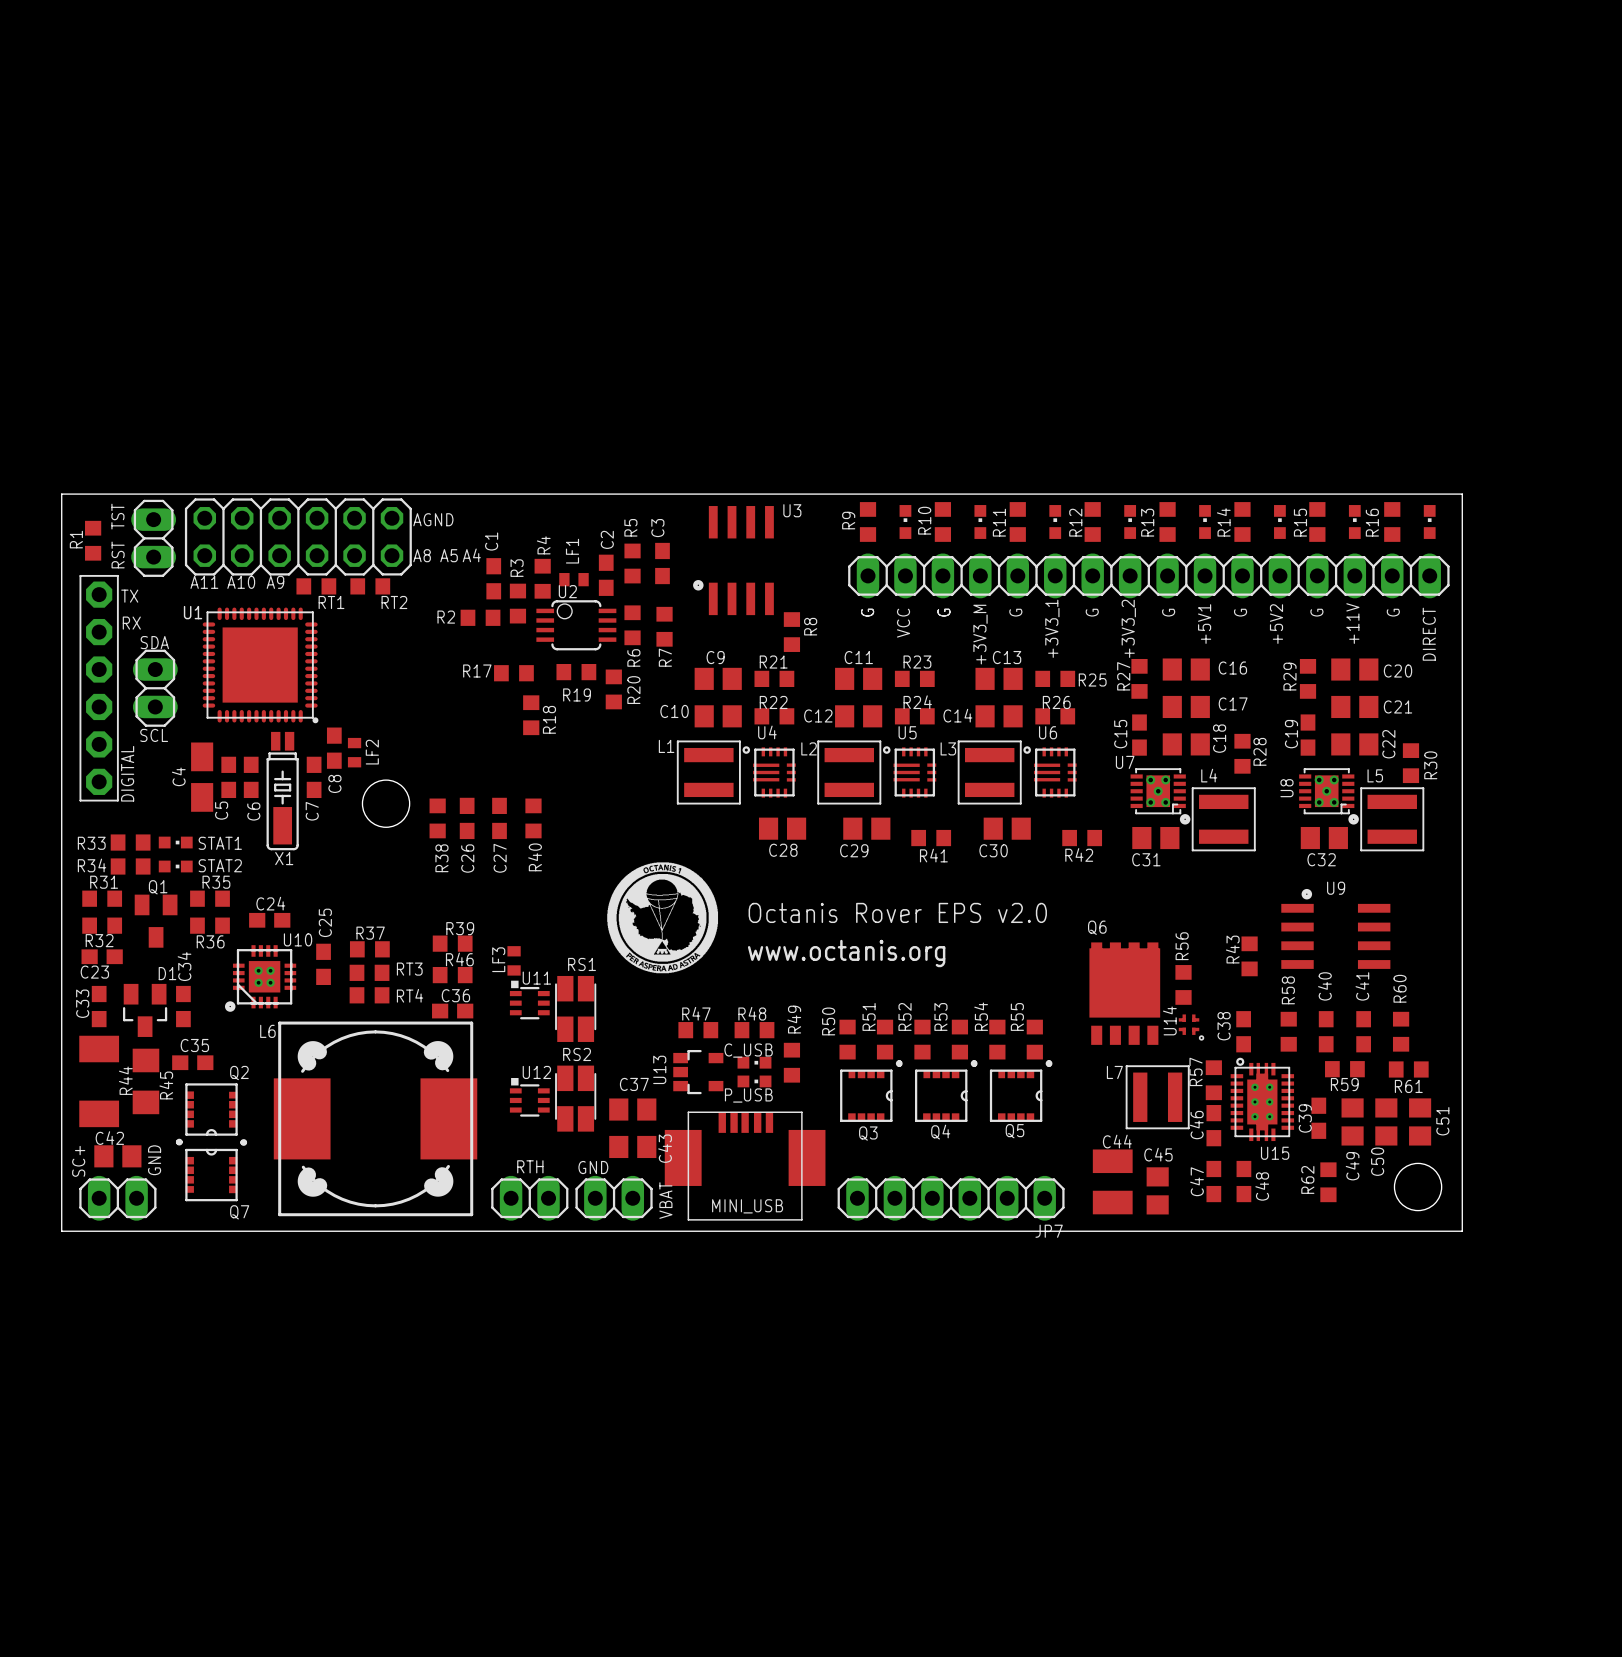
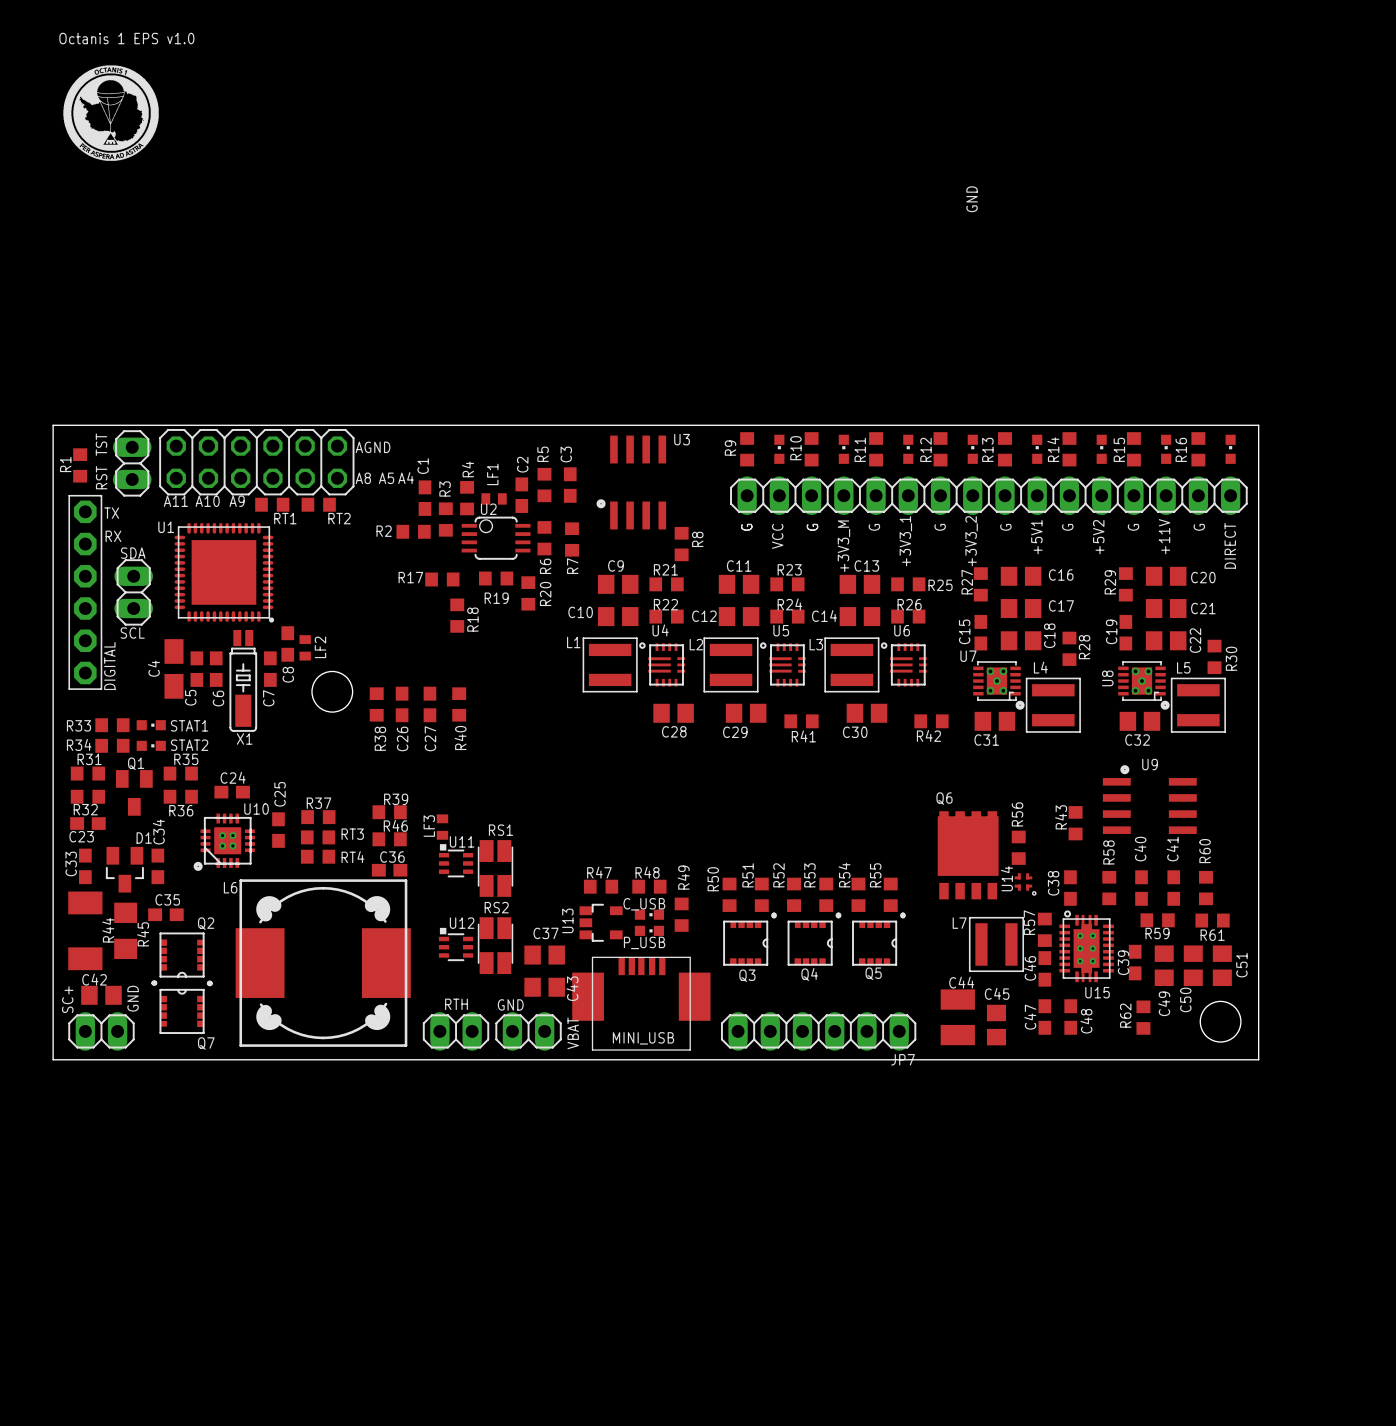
text: none -> Octanis 1 EPS v1.0 (126, 38)
drawing: none -> [63, 65, 159, 161]
text: none -> GND (972, 199)
drawing: [607, 862, 719, 974] -> none
text: Octanis Rover EPS v2.0 (897, 912) -> none
text: www.octanis.org (846, 953) -> none

